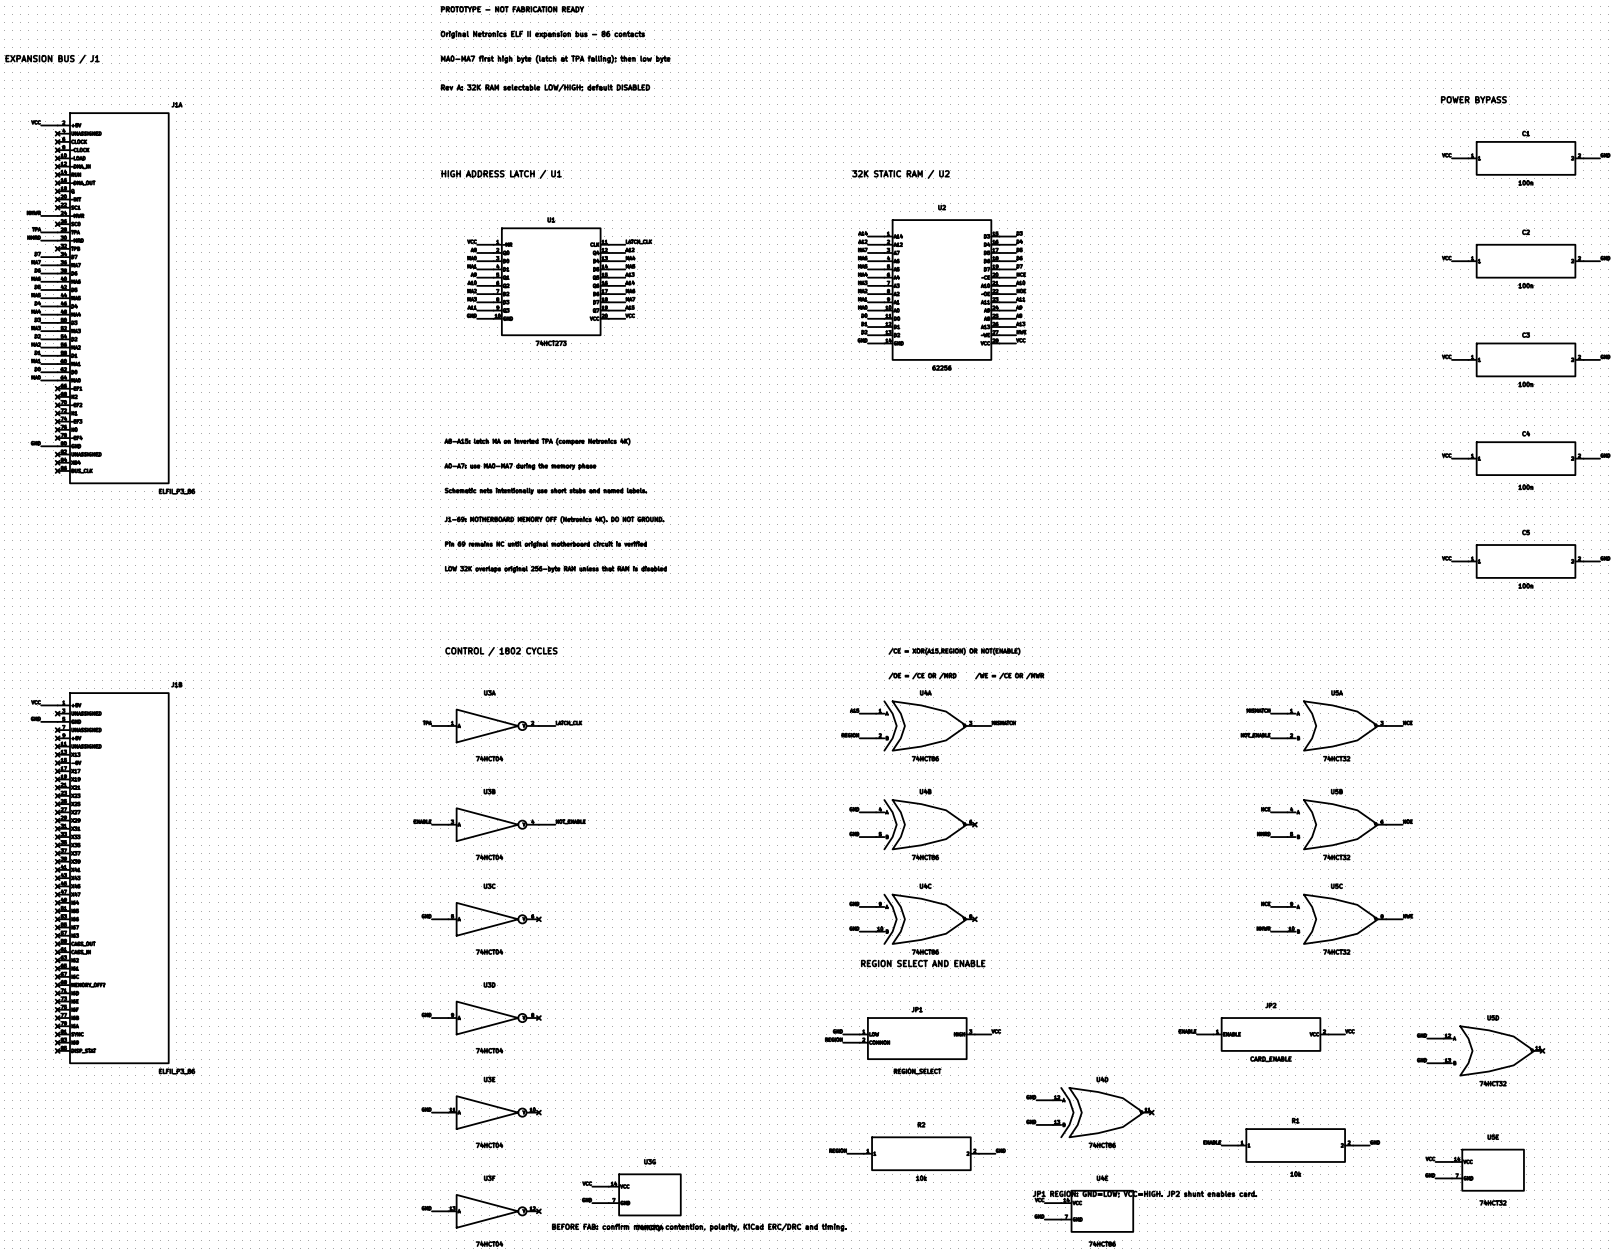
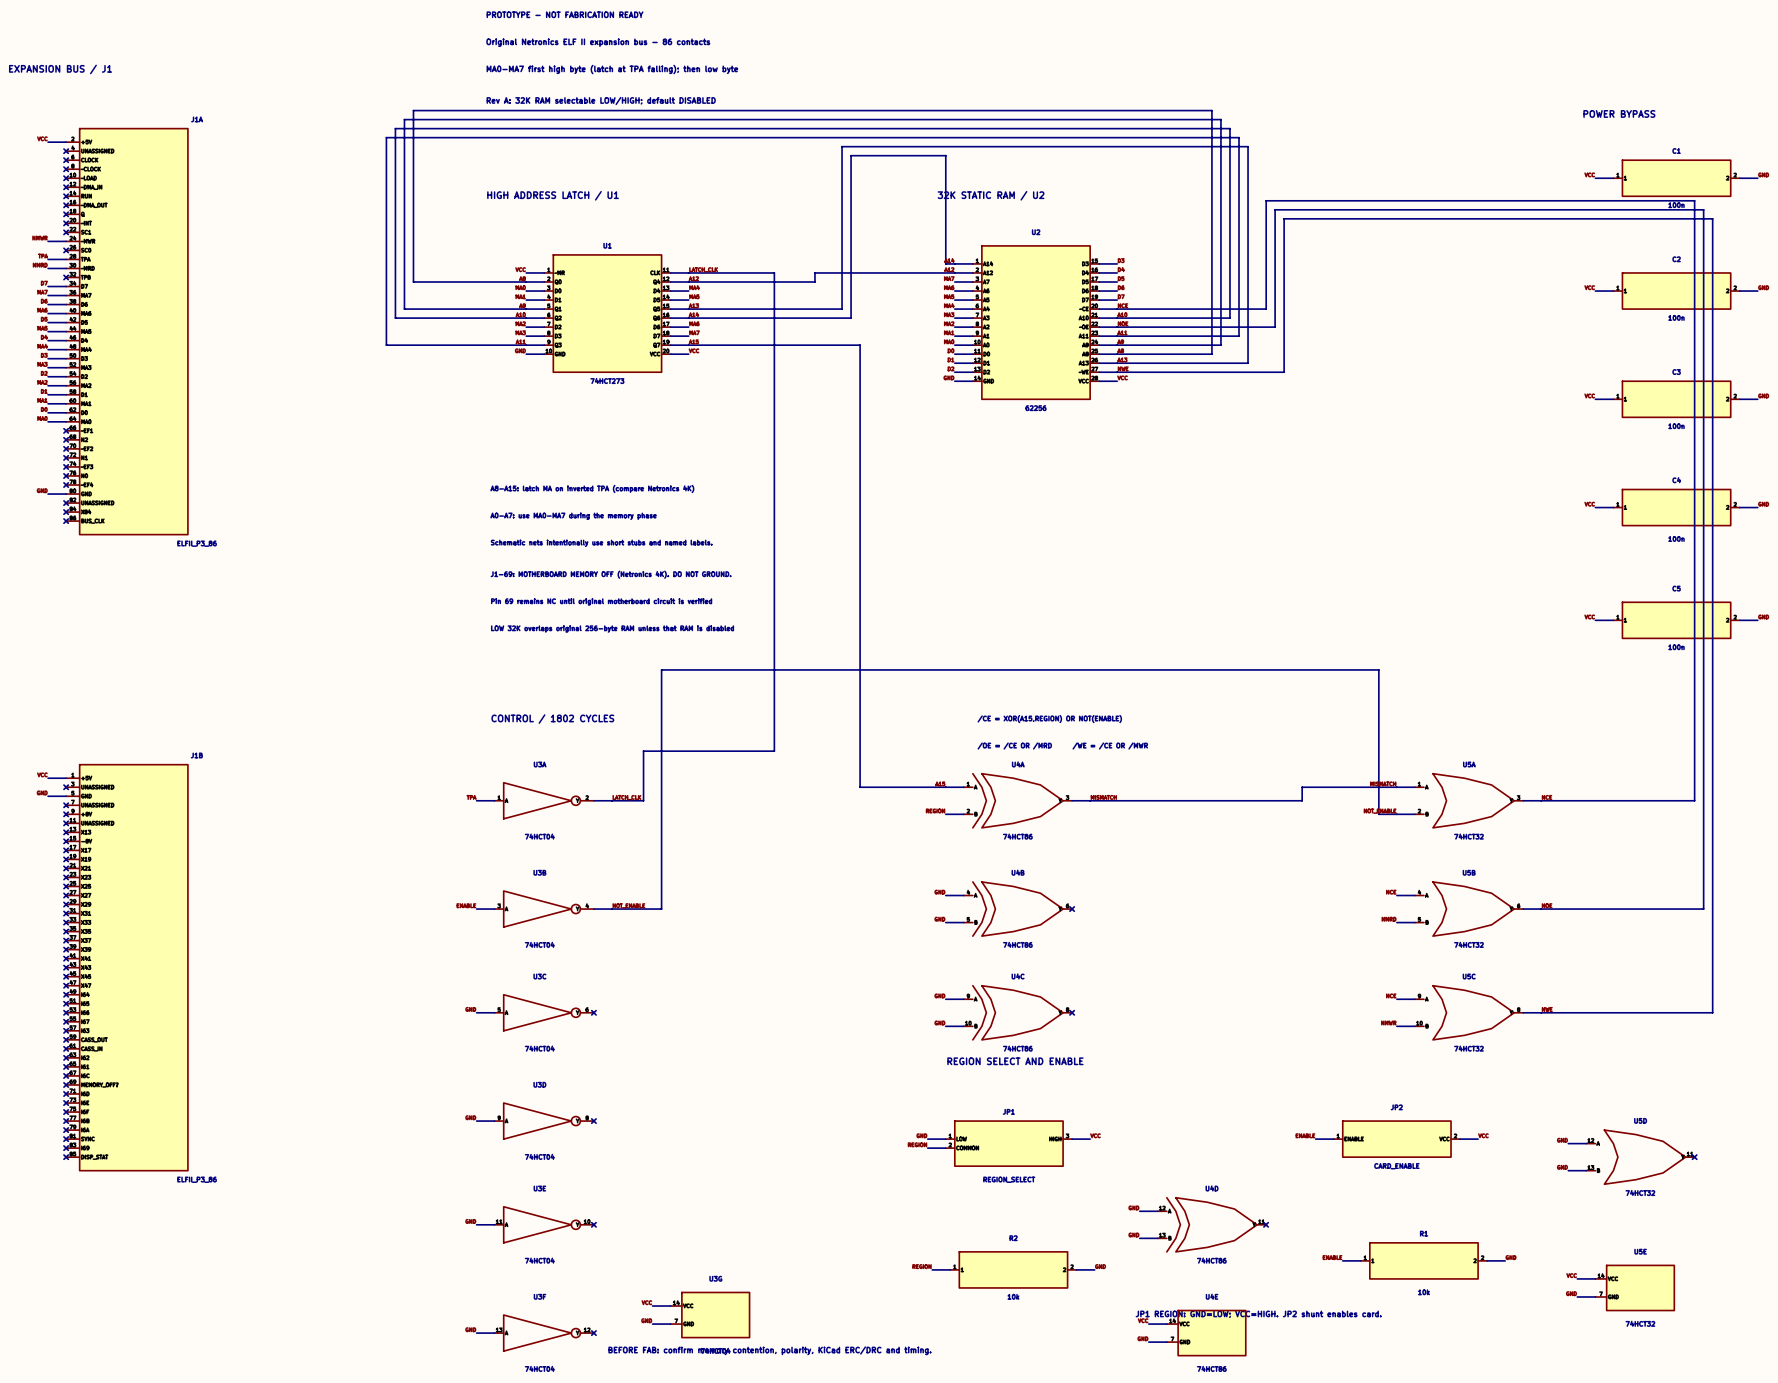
wire: none -> (954, 263) (945, 263) (945, 155) (851, 155) (851, 318) (688, 318)
wire: none -> (688, 272) (774, 272) (774, 751) (643, 751) (643, 800) (611, 800)
wire: none -> (954, 272) (814, 272) (814, 282) (688, 282)
wire: none -> (526, 282) (413, 282) (413, 110) (1211, 110) (1211, 354) (1117, 354)
wire: none -> (526, 309) (404, 309) (404, 119) (1220, 119) (1220, 345) (1117, 345)
wire: none -> (688, 309) (842, 309) (842, 146) (1248, 146) (1248, 363) (1117, 363)
wire: none -> (1117, 309) (1266, 309) (1266, 200) (1694, 200) (1694, 800) (1541, 800)
wire: none -> (526, 318) (395, 318) (395, 128) (1229, 128) (1229, 318) (1117, 318)
wire: none -> (1117, 327) (1275, 327) (1275, 209) (1703, 209) (1703, 909) (1541, 909)
wire: none -> (1117, 336) (1239, 336) (1239, 137) (386, 137) (386, 345) (526, 345)
wire: none -> (688, 345) (860, 345) (860, 787) (945, 787)
wire: none -> (1117, 372) (1284, 372) (1284, 218) (1712, 218) (1712, 1012) (1541, 1012)
wire: none -> (1396, 787) (1302, 787) (1302, 800) (1090, 800)
wire: none -> (1396, 814) (1378, 814) (1378, 669) (661, 669) (661, 909) (611, 909)

